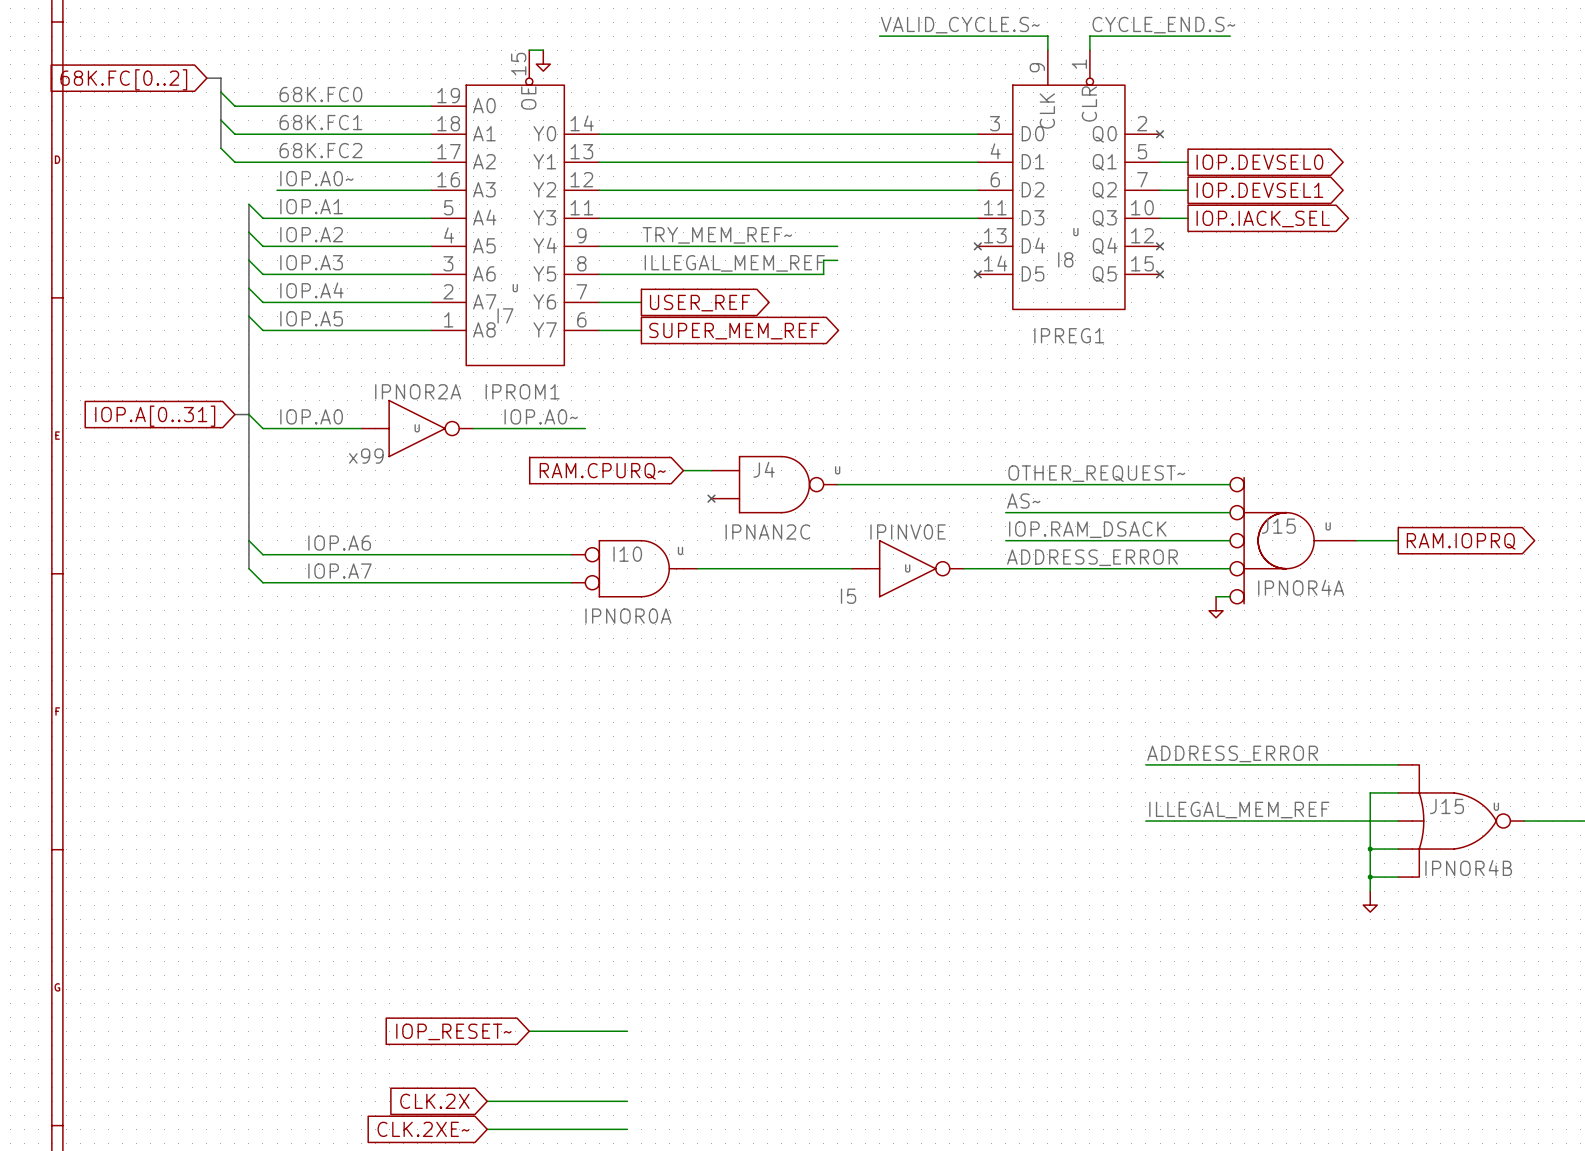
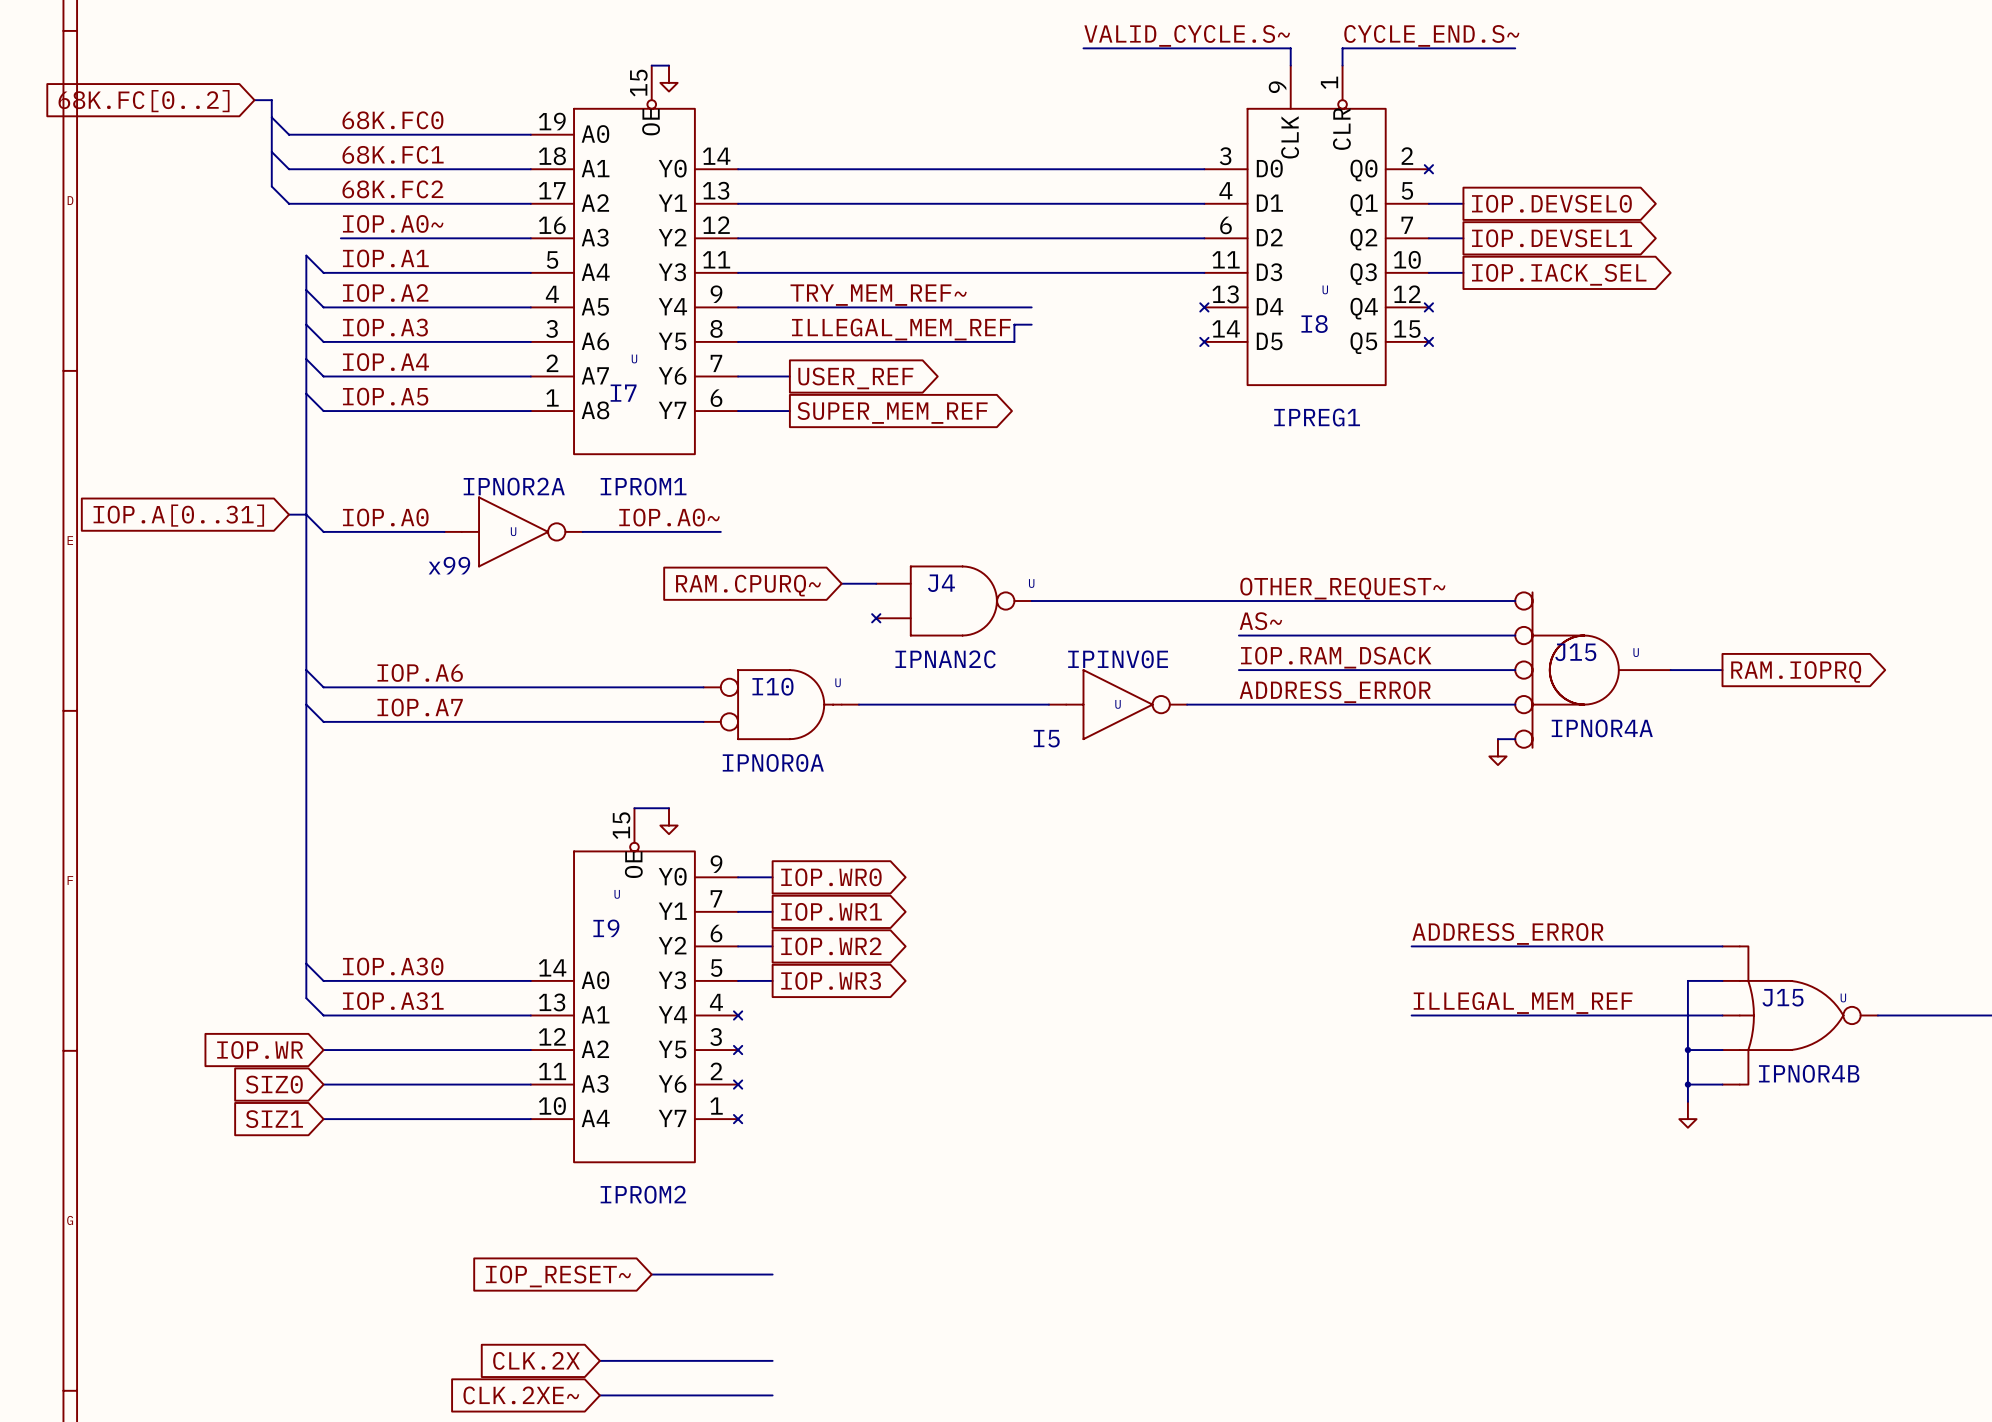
bus: none -> (306, 704) (306, 998)
wire: none -> (634, 808) (669, 808)
power symbol: none -> (669, 821)
wire: none -> (738, 877) (772, 877)
global label: none -> IOP.WR0 (831, 877)
wire: none -> (738, 911) (772, 911)
global label: none -> IOP.WR1 (831, 911)
wire: none -> (738, 946) (772, 946)
global label: none -> IOP.WR2 (831, 946)
wire: none -> (306, 963) (323, 980) (530, 980)
label: none -> IOP.A30 (393, 966)
wire: none -> (738, 980) (772, 980)
global label: none -> IOP.WR3 (831, 980)
U: none -> (634, 985)
wire: none -> (306, 998) (323, 1015) (530, 1015)
label: none -> IOP.A31 (393, 1001)
no-connect mark: none -> (738, 1015)
global label: none -> IOP.WR (260, 1050)
wire: none -> (323, 1050) (530, 1050)
no-connect mark: none -> (738, 1050)
global label: none -> SIZ0 (274, 1084)
wire: none -> (323, 1084) (530, 1084)
no-connect mark: none -> (738, 1084)
global label: none -> SIZ1 (274, 1119)
wire: none -> (323, 1119) (530, 1119)
no-connect mark: none -> (738, 1119)

